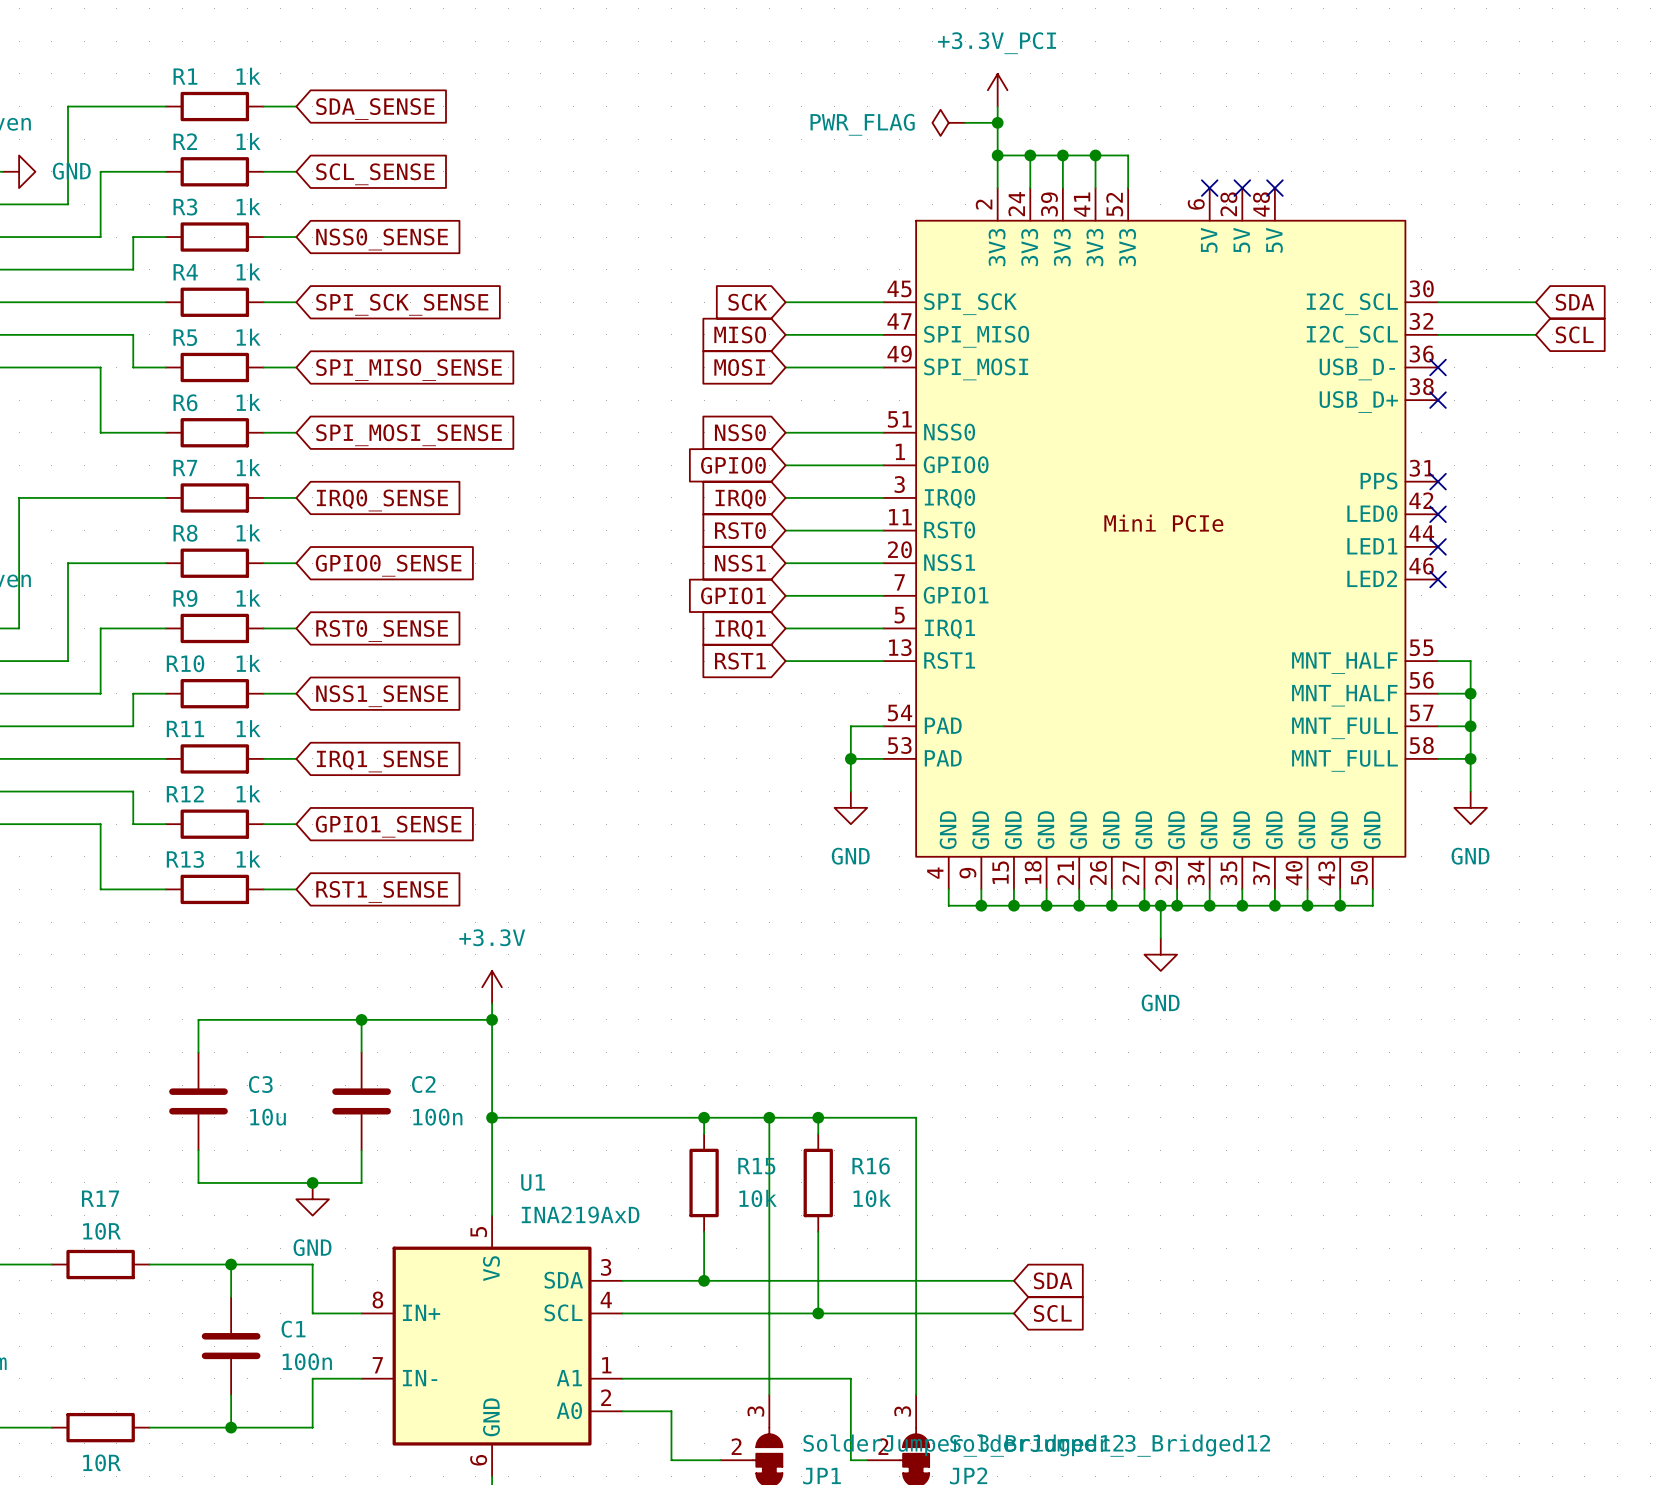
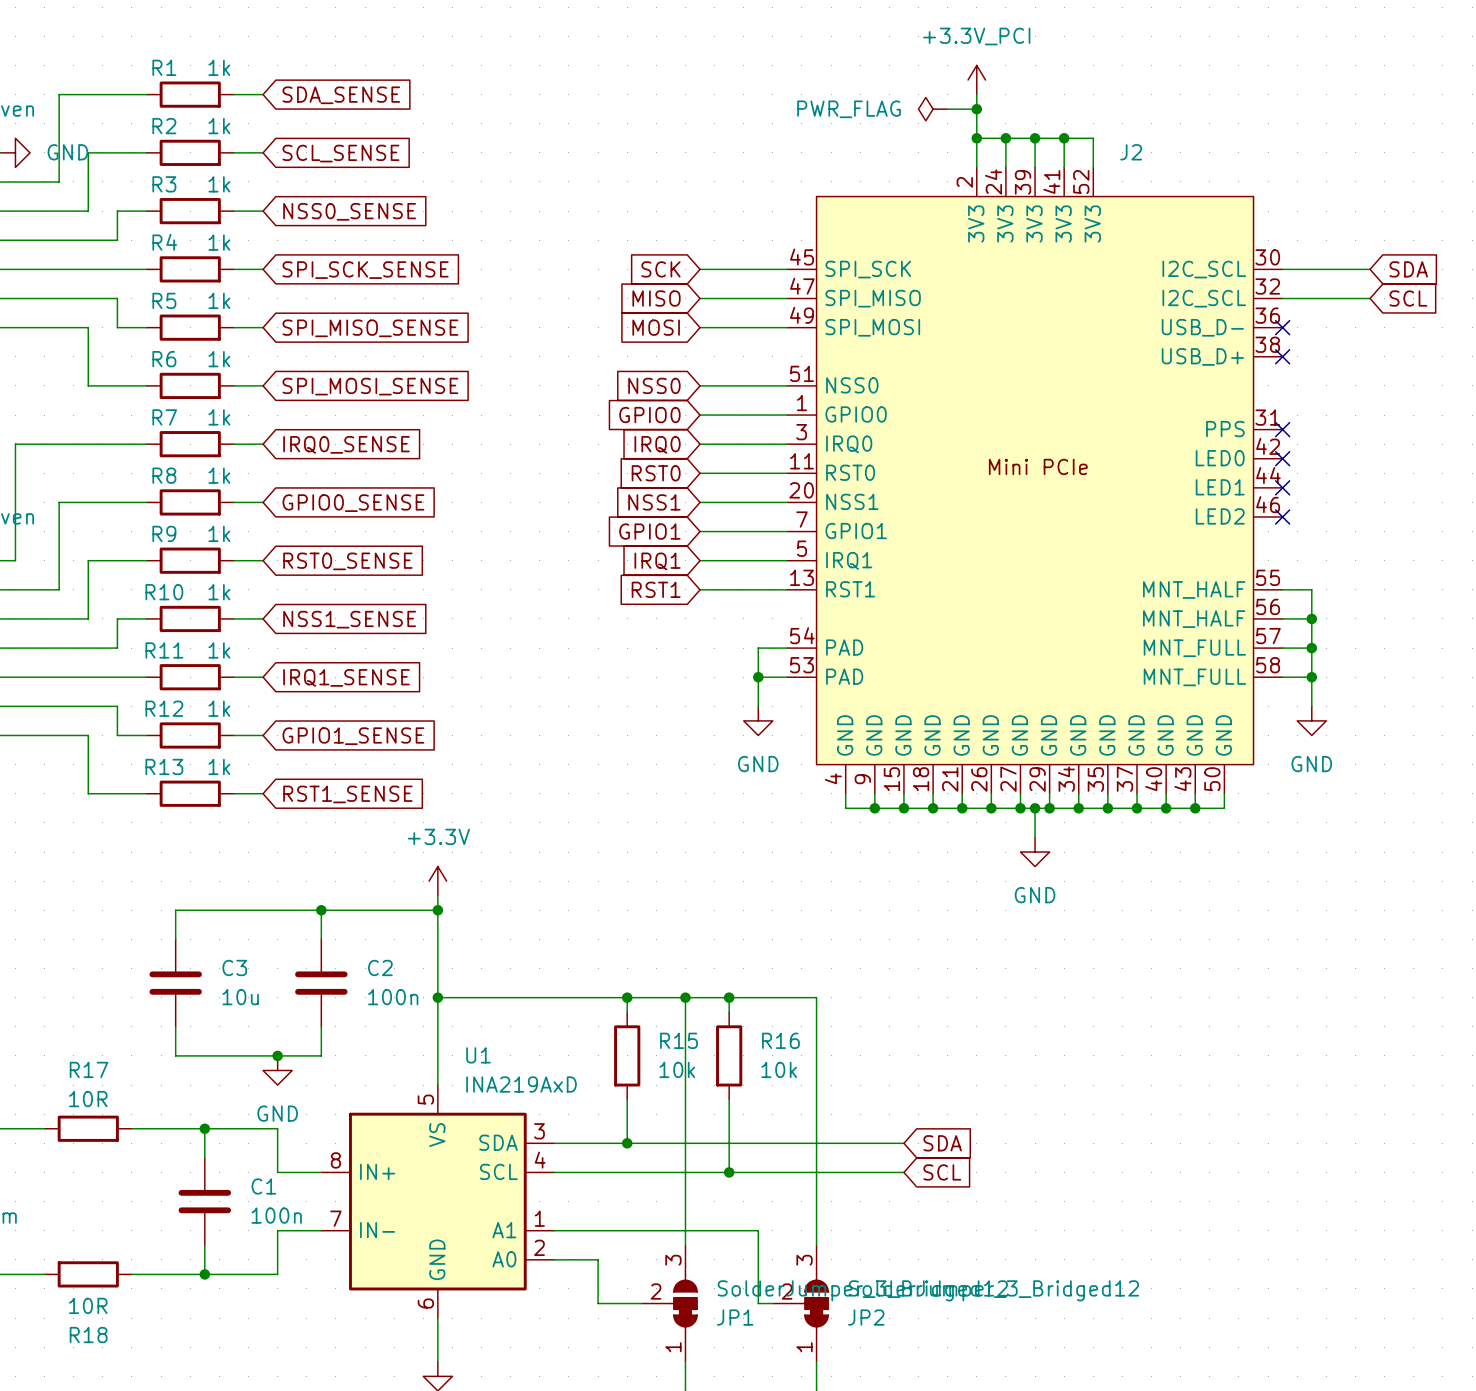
power symbol position: +3.3V_PCI (997, 90) -> +3.3V_PCI (976, 80)
wire: (997, 106) (997, 188) -> none
power symbol position: PWR_FLAG (948, 122) -> PWR_FLAG (933, 109)
wire: (965, 122) (997, 122) -> (947, 109) (976, 109)
junction: (997, 122) -> none
junction: none -> (976, 109)
wire: (997, 155) (1095, 155) -> (976, 94) (976, 138)
junction: (997, 155) -> none
wire: (1030, 155) (1030, 188) -> (1064, 138) (1064, 167)
junction: (1030, 155) -> none
wire: (1062, 155) (1062, 188) -> (1035, 138) (1035, 167)
junction: (1062, 155) -> none
wire: none -> (1005, 138) (1093, 138) (1093, 167)
junction: none -> (1005, 138)
junction: none -> (1035, 138)
junction: none -> (1064, 138)
no-connect mark: (1209, 188) -> none
no-connect mark: (1242, 188) -> none
no-connect mark: (1274, 188) -> none
part: (1160, 538) -> none
J2: none -> (1035, 480)

